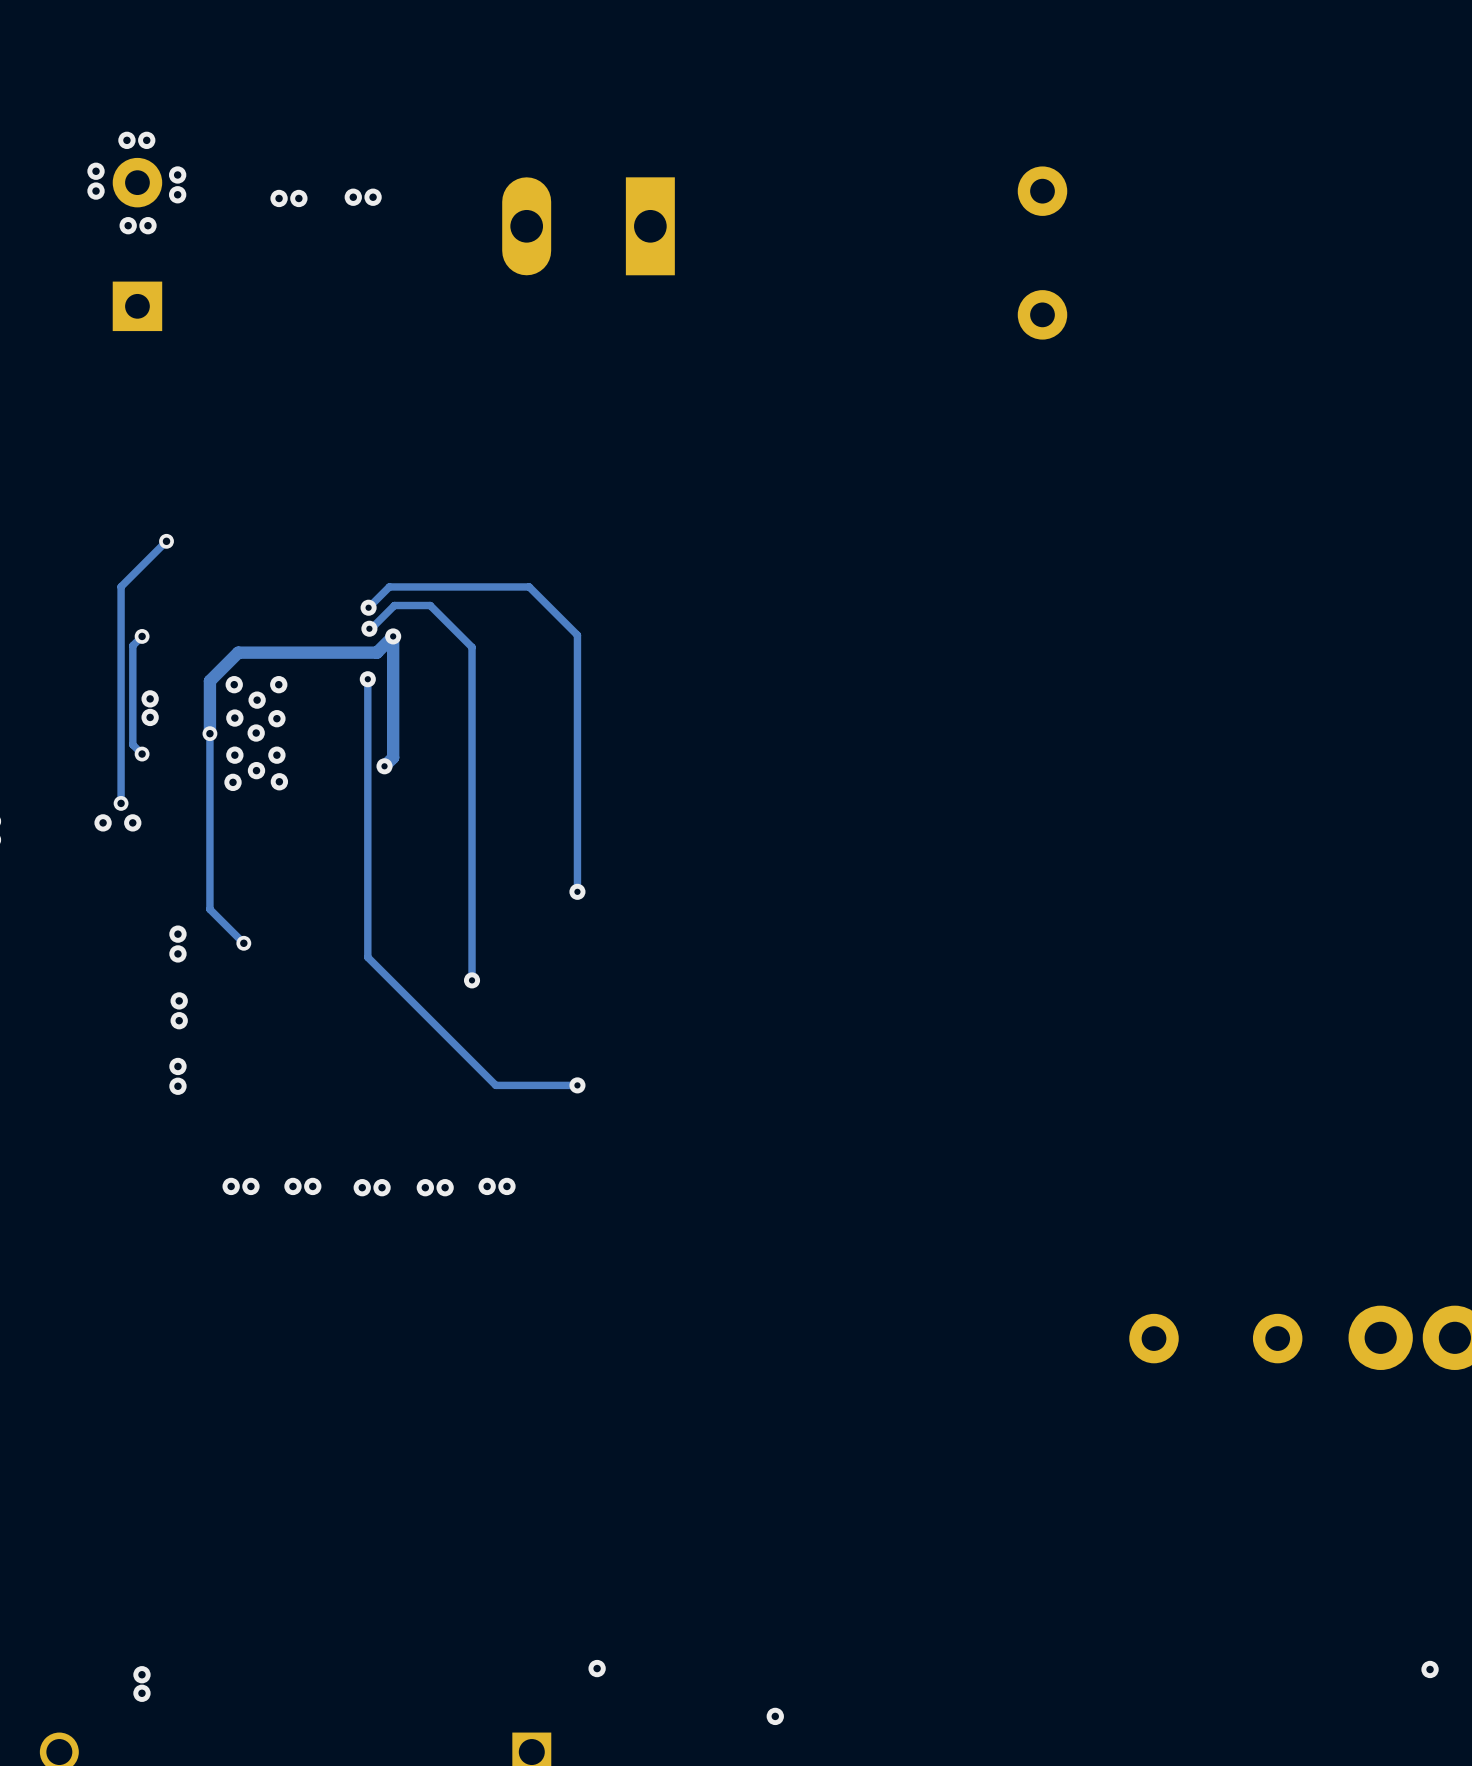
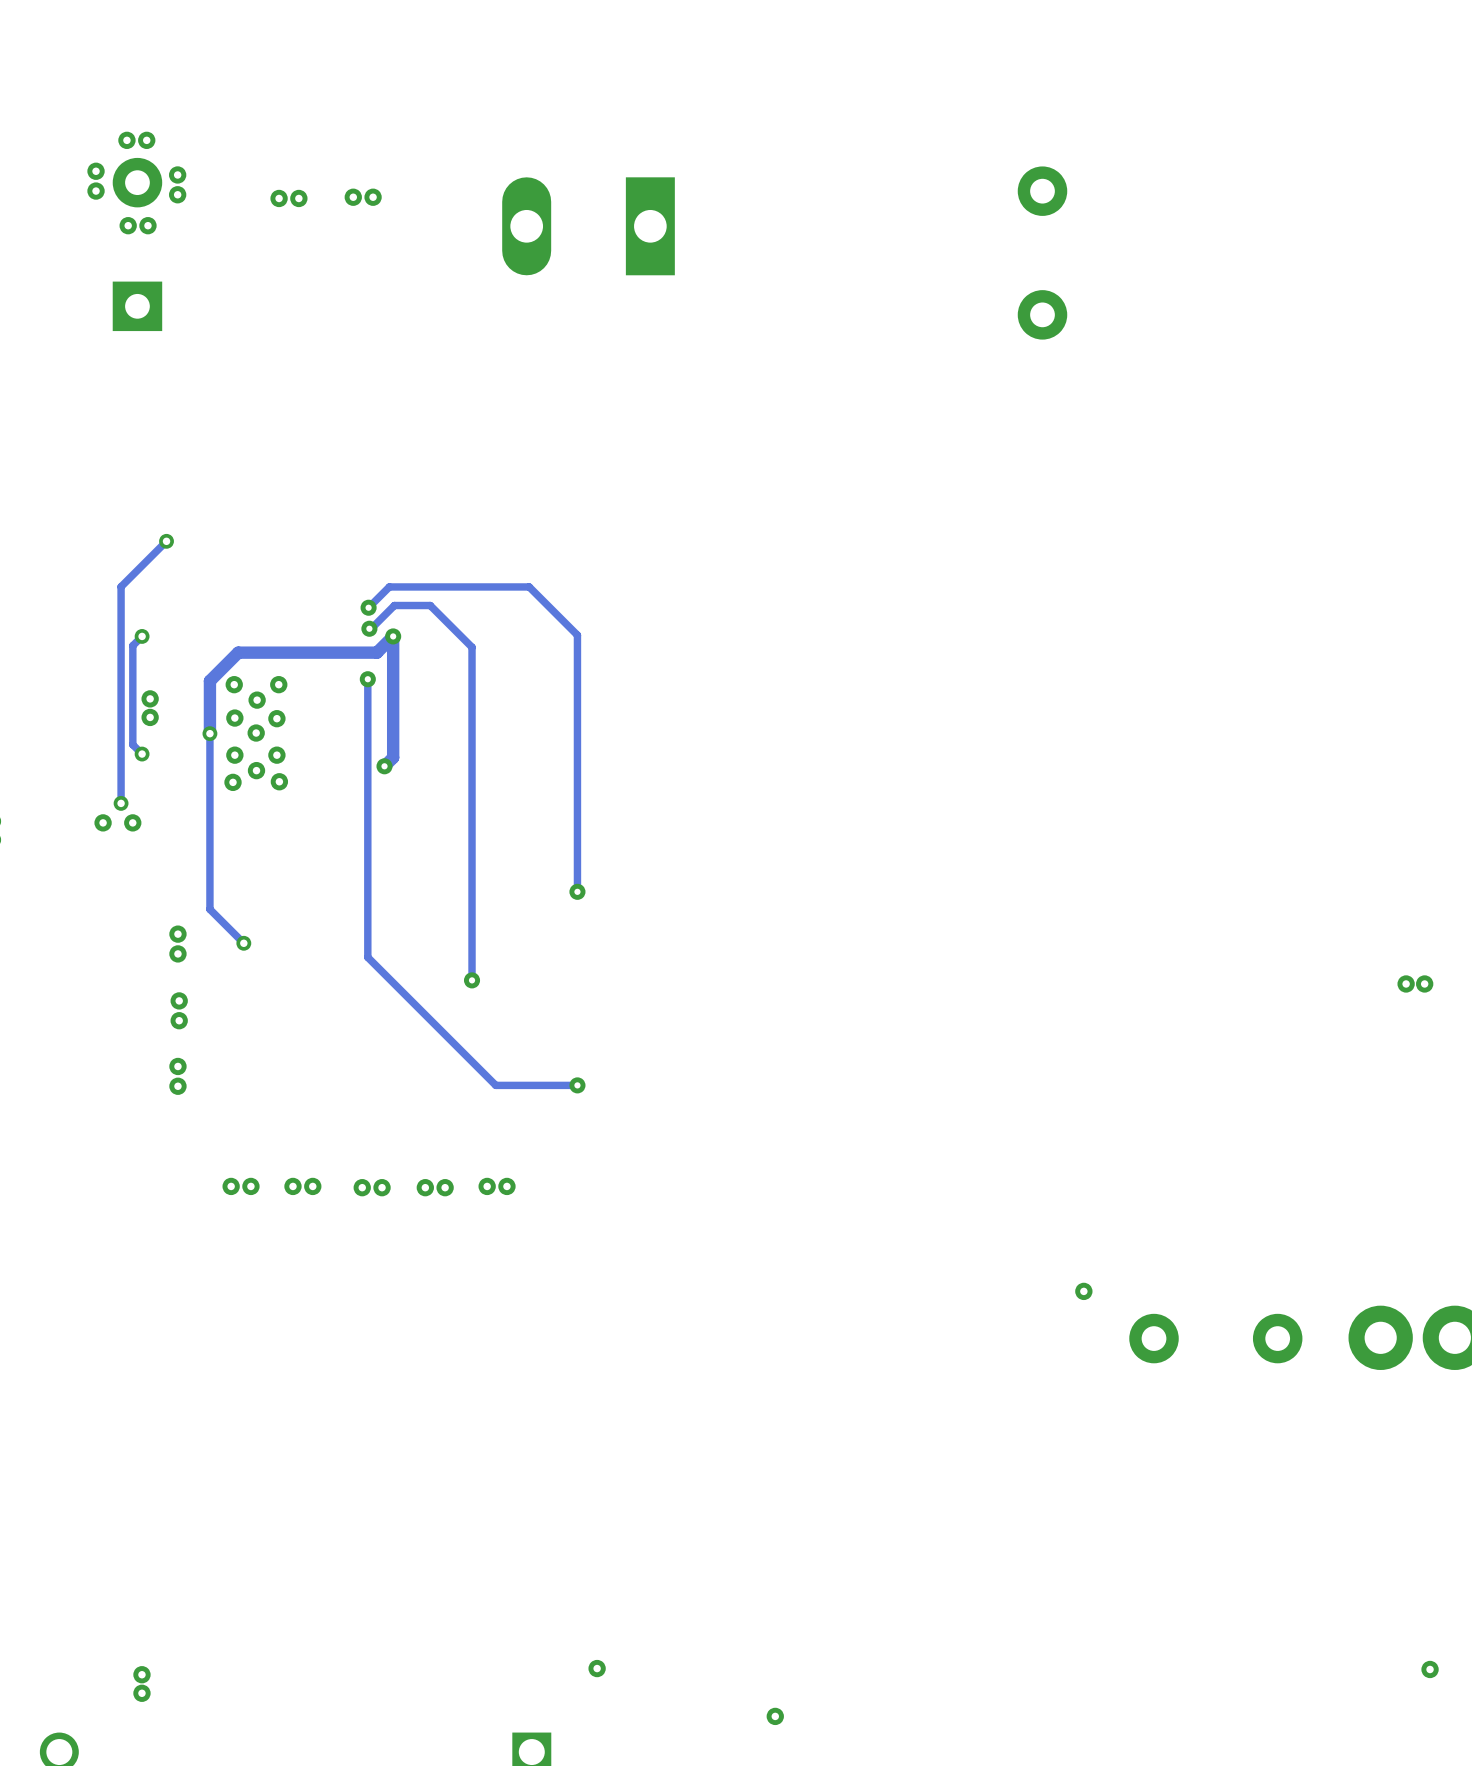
via: none -> (1406, 983)
via: none -> (1424, 983)
via: none -> (1083, 1291)

